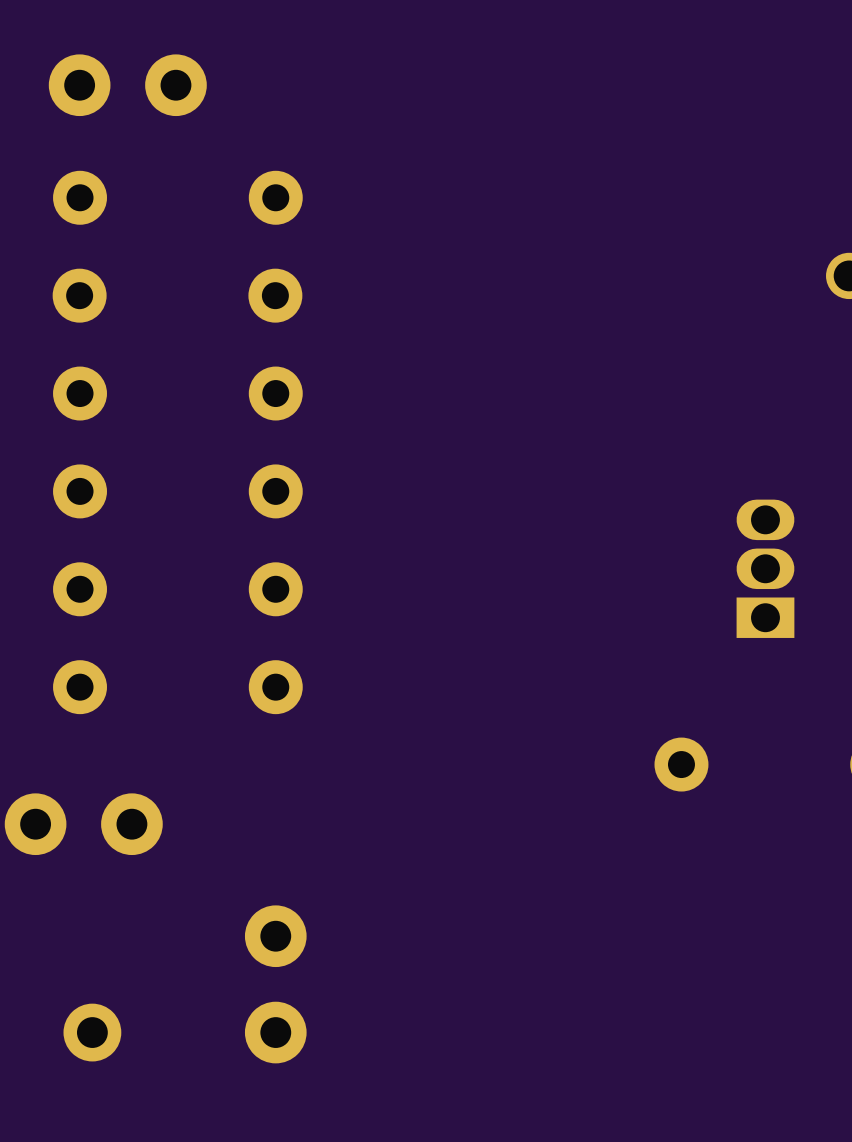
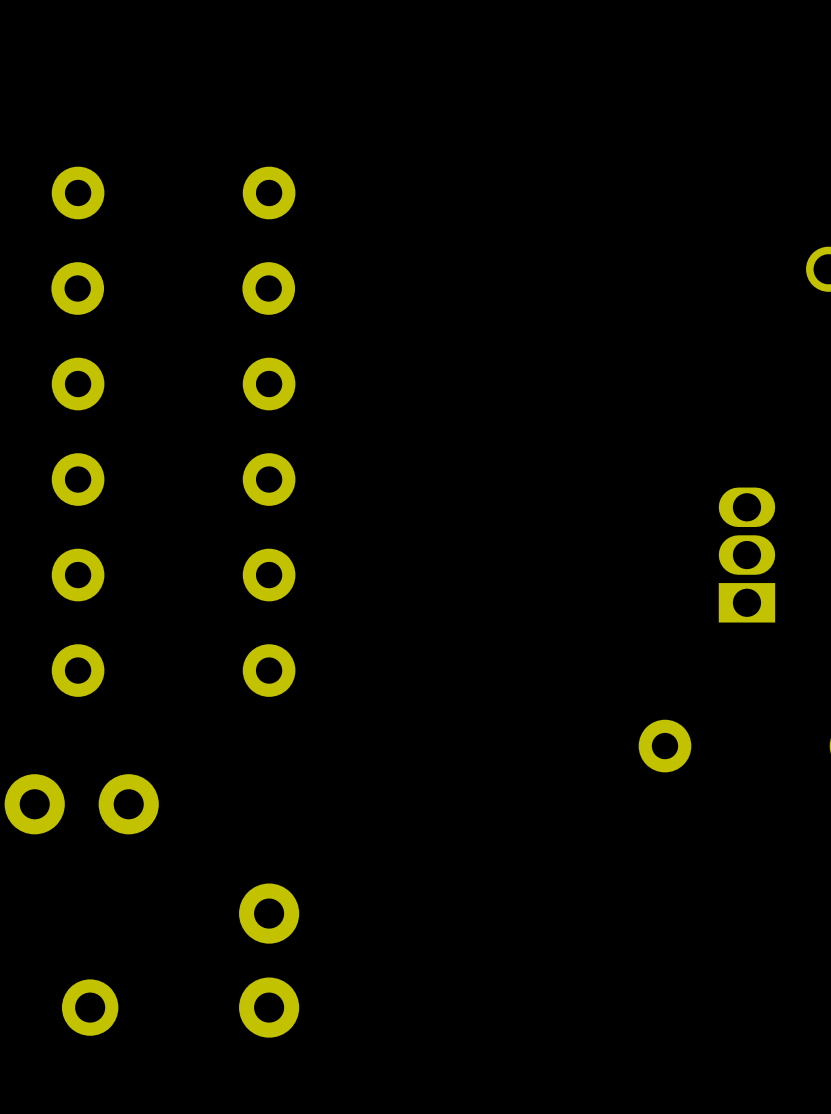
part: (127, 85) -> none

